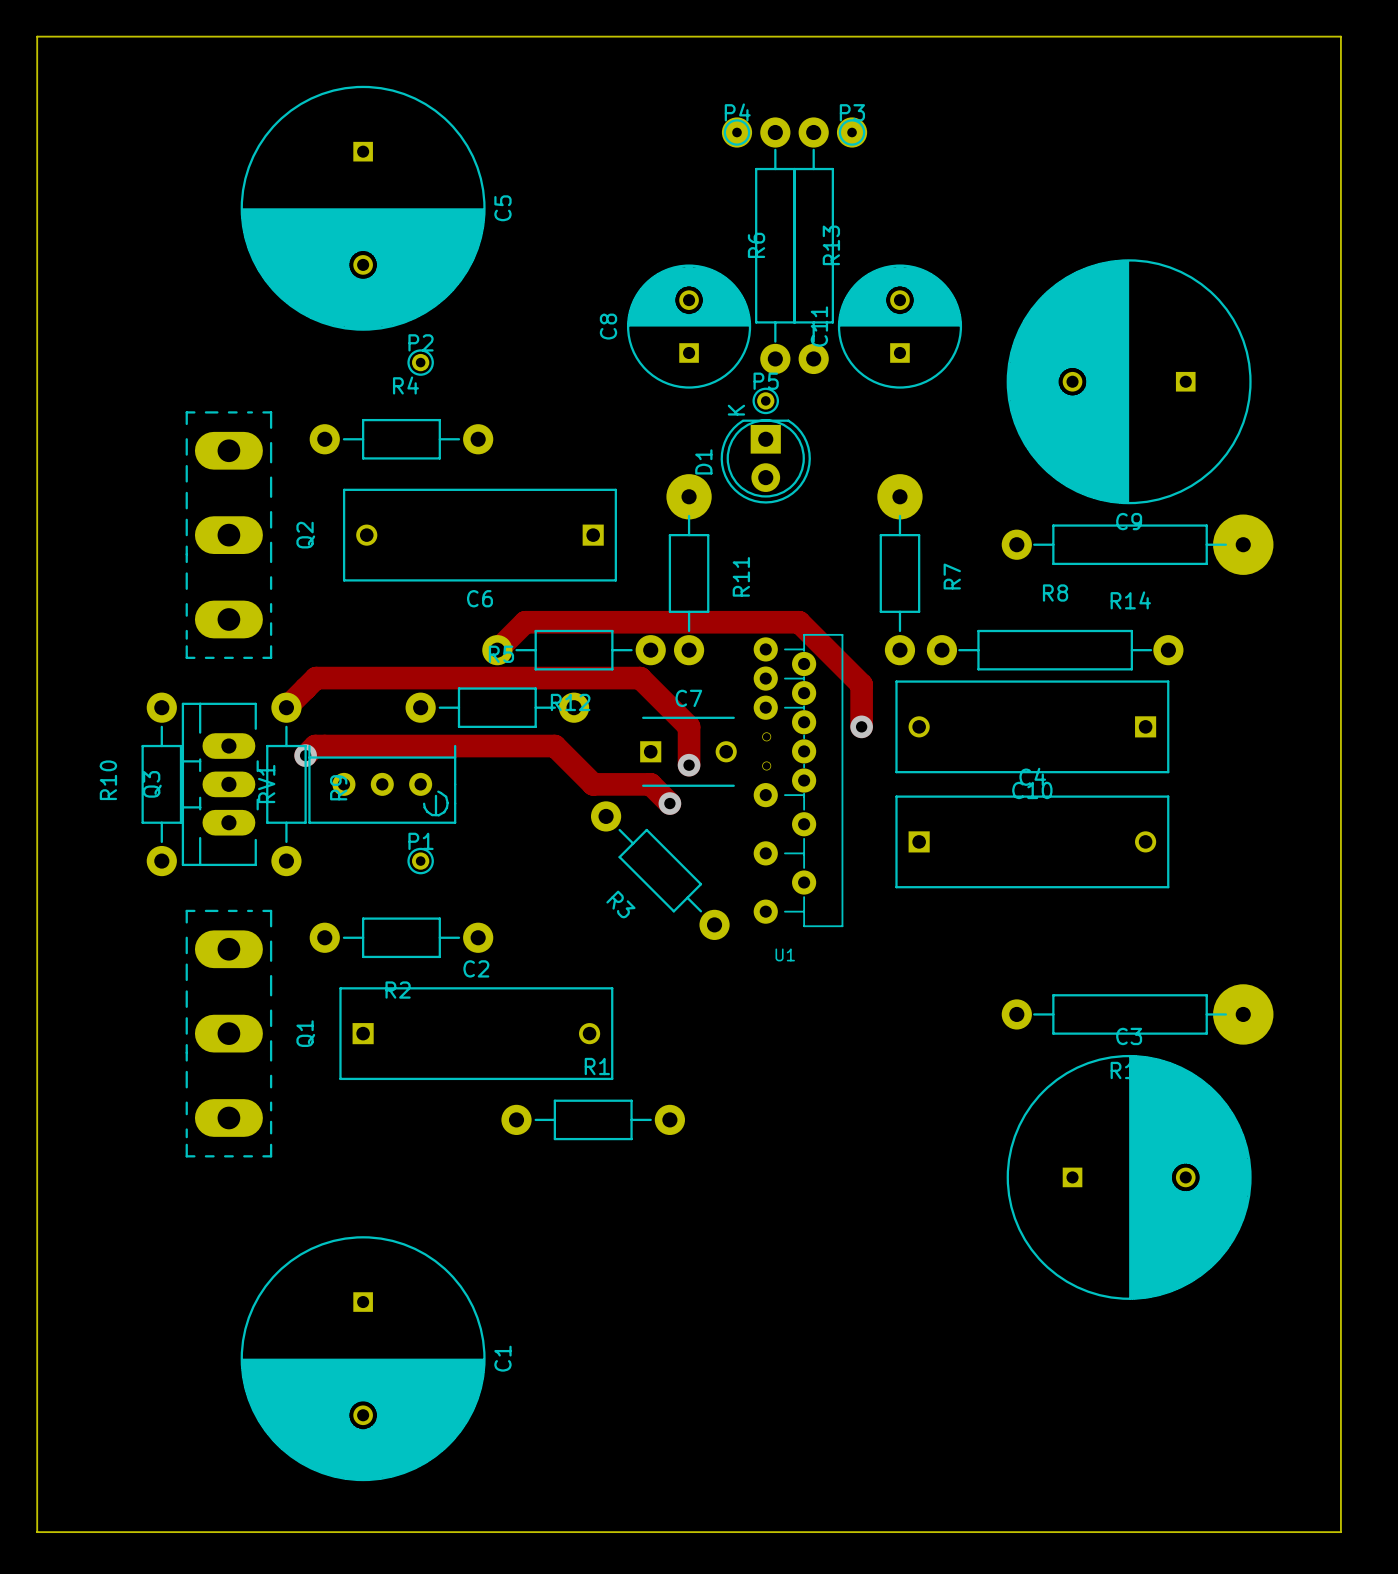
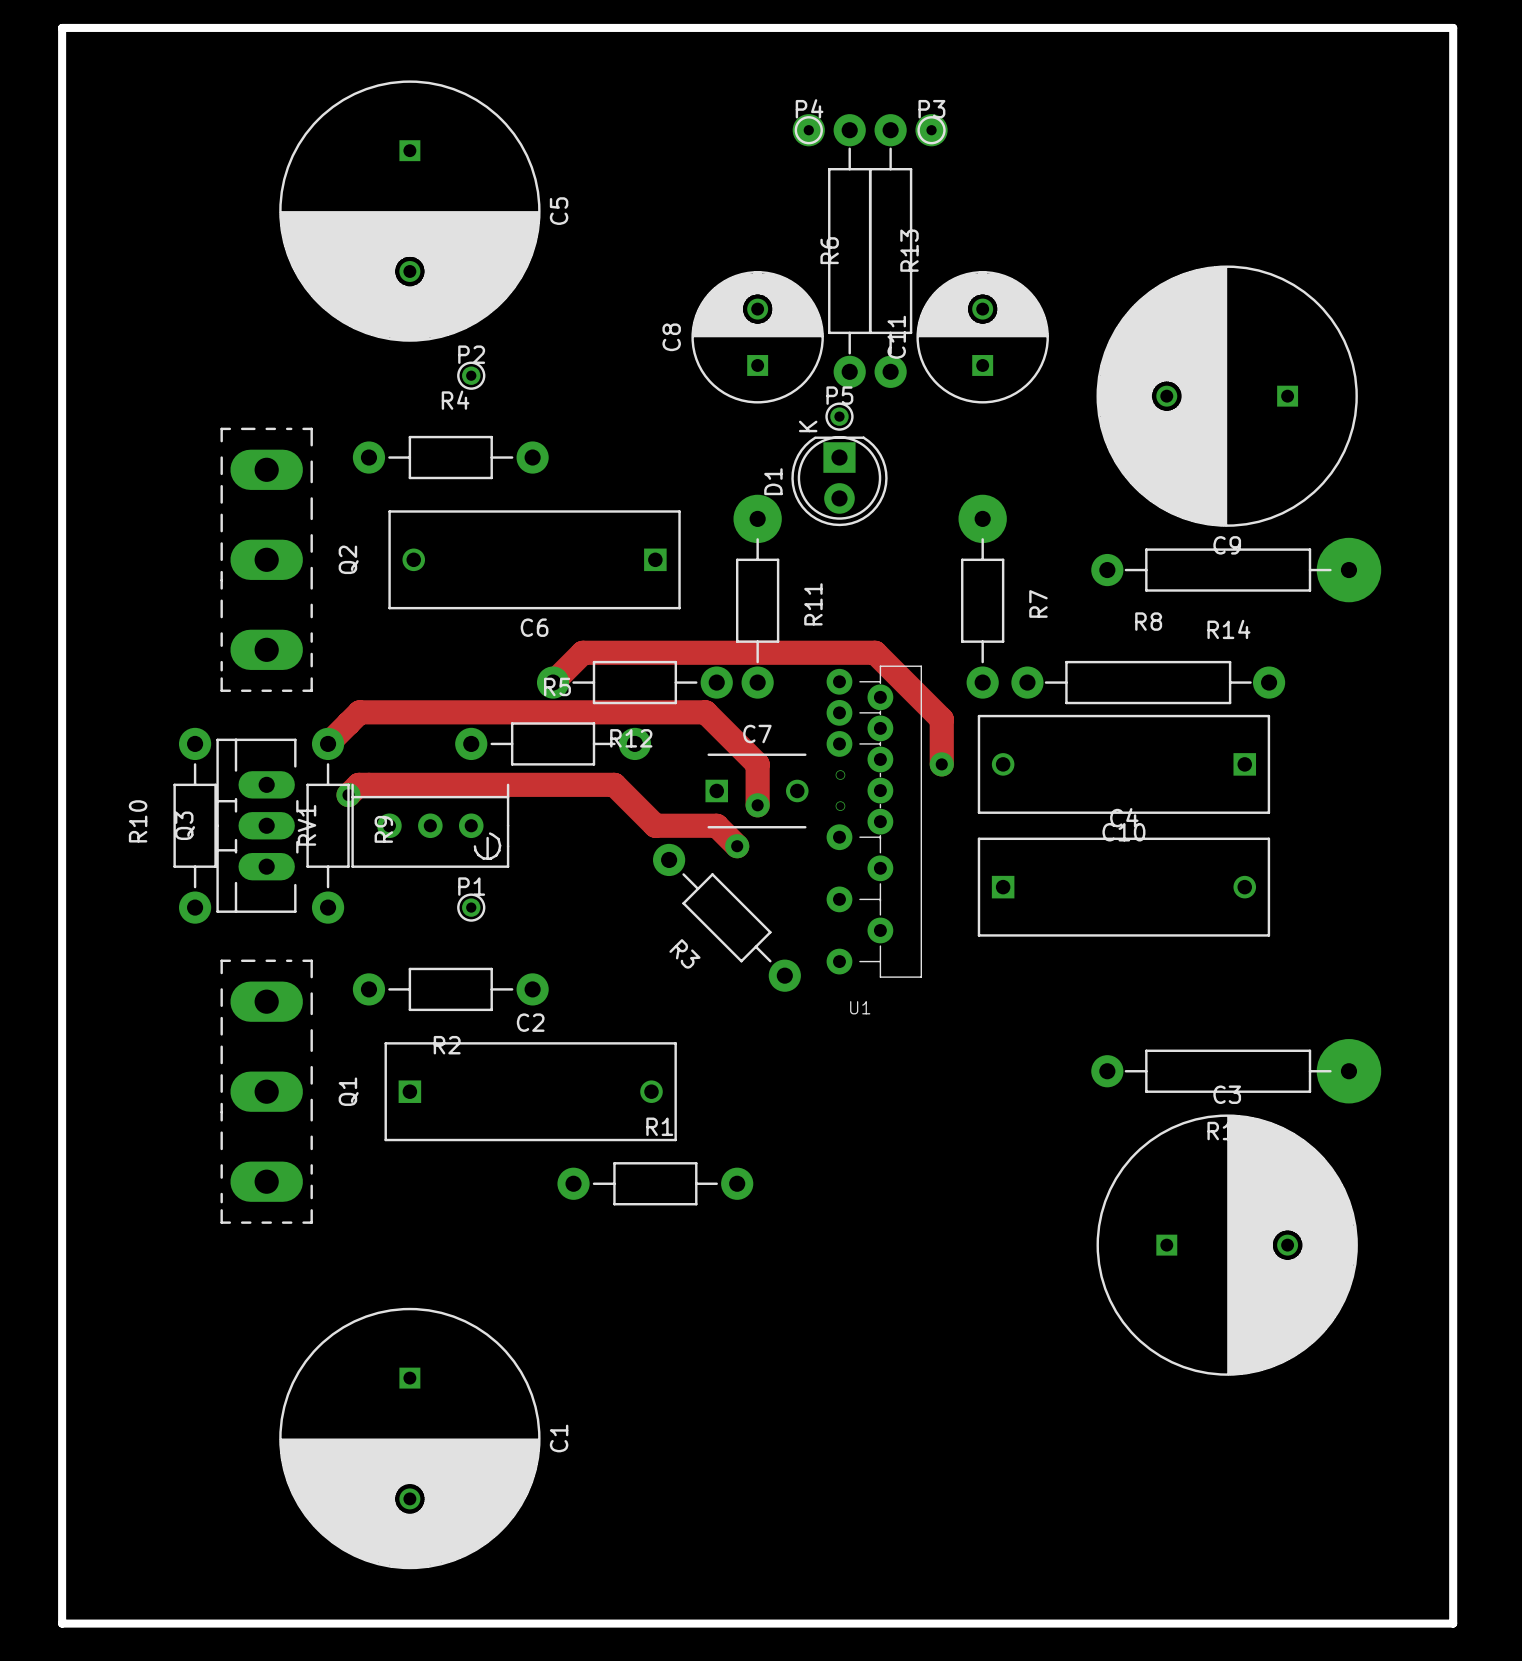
board edge width: thin (37, 36) (37, 1532) (1340, 1532) (1340, 36) (37, 36) -> thick (62, 27) (62, 1623) (1453, 1623) (1453, 27) (62, 27)

